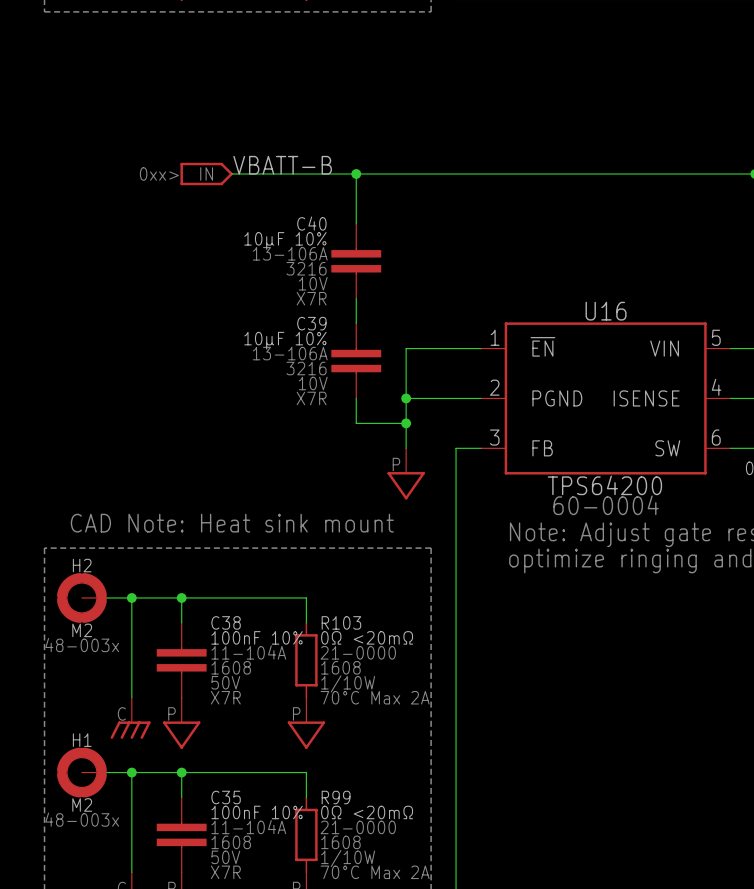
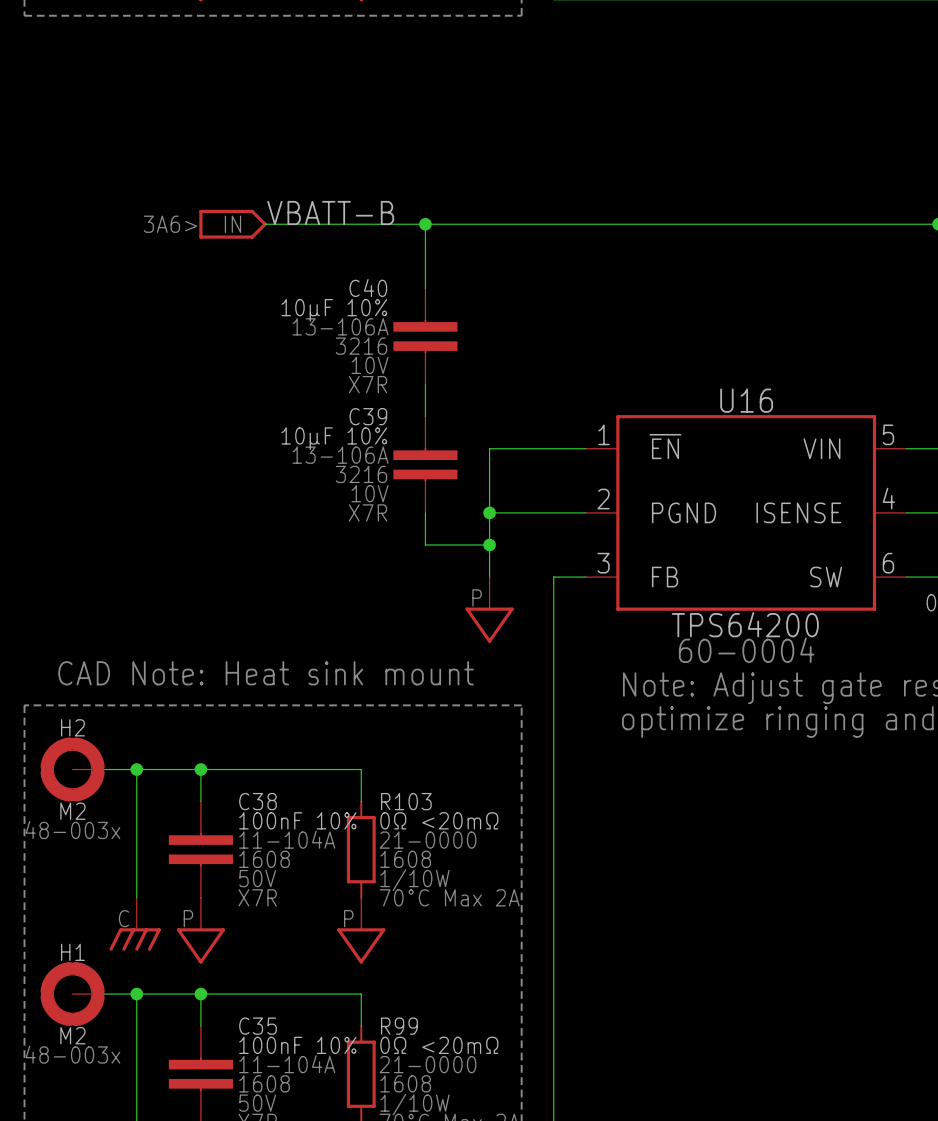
text: 0xx> (159, 174) -> 3A6> (170, 224)

